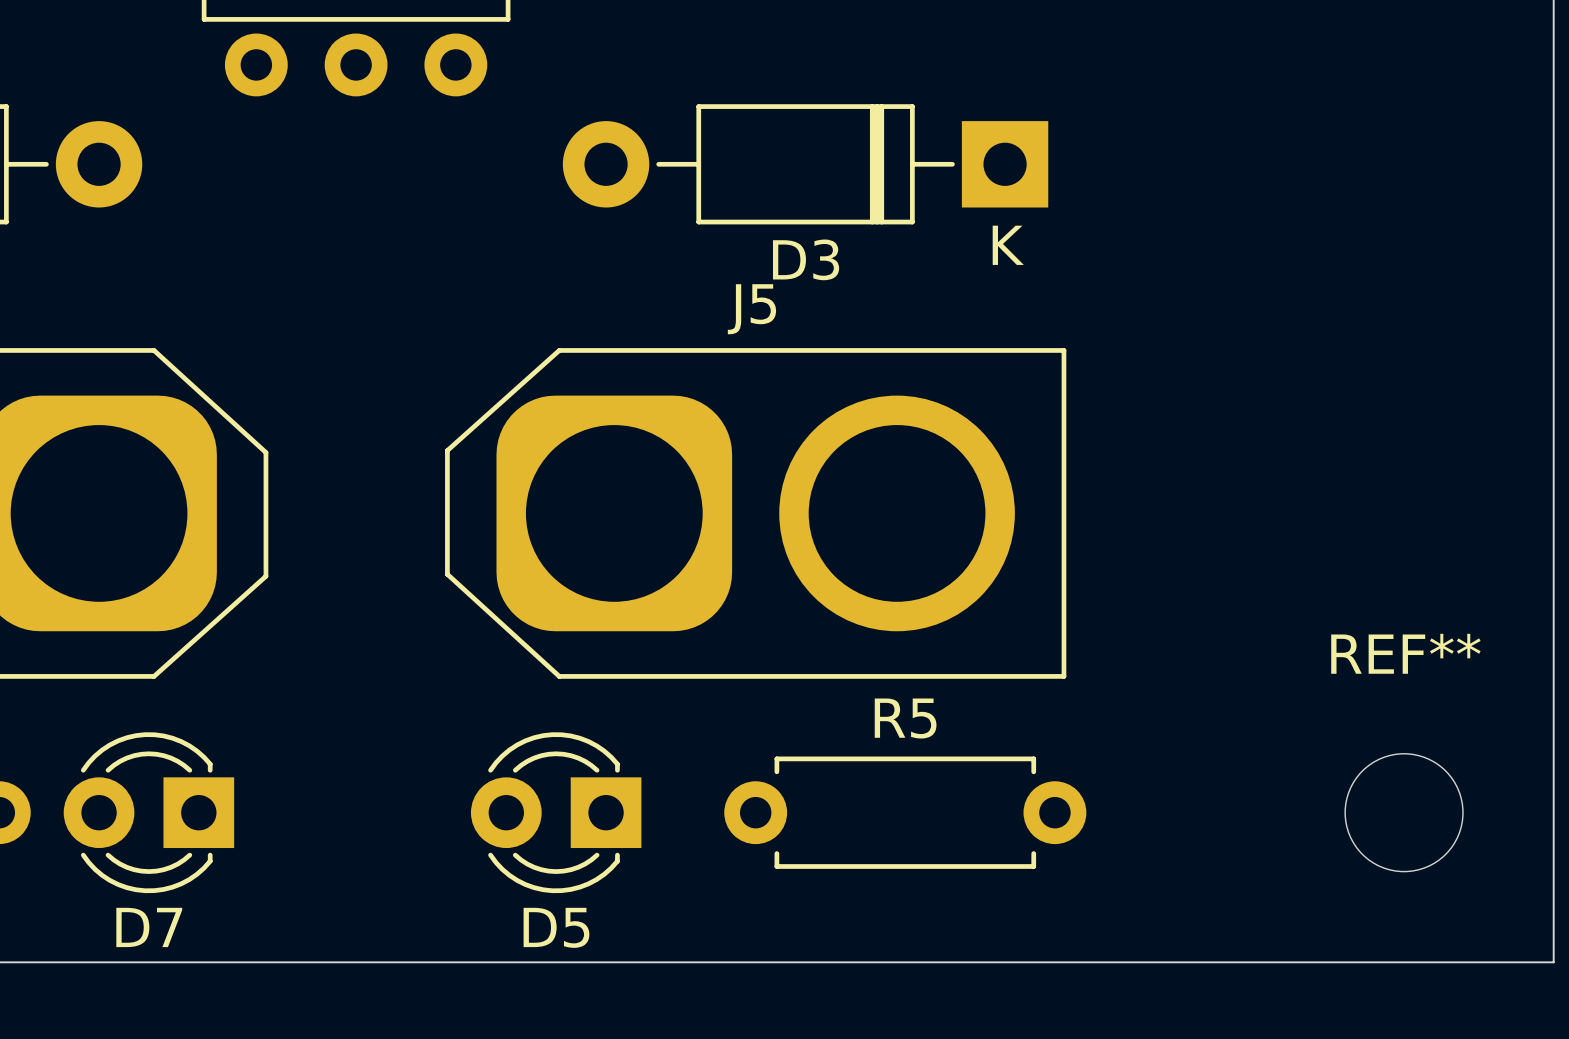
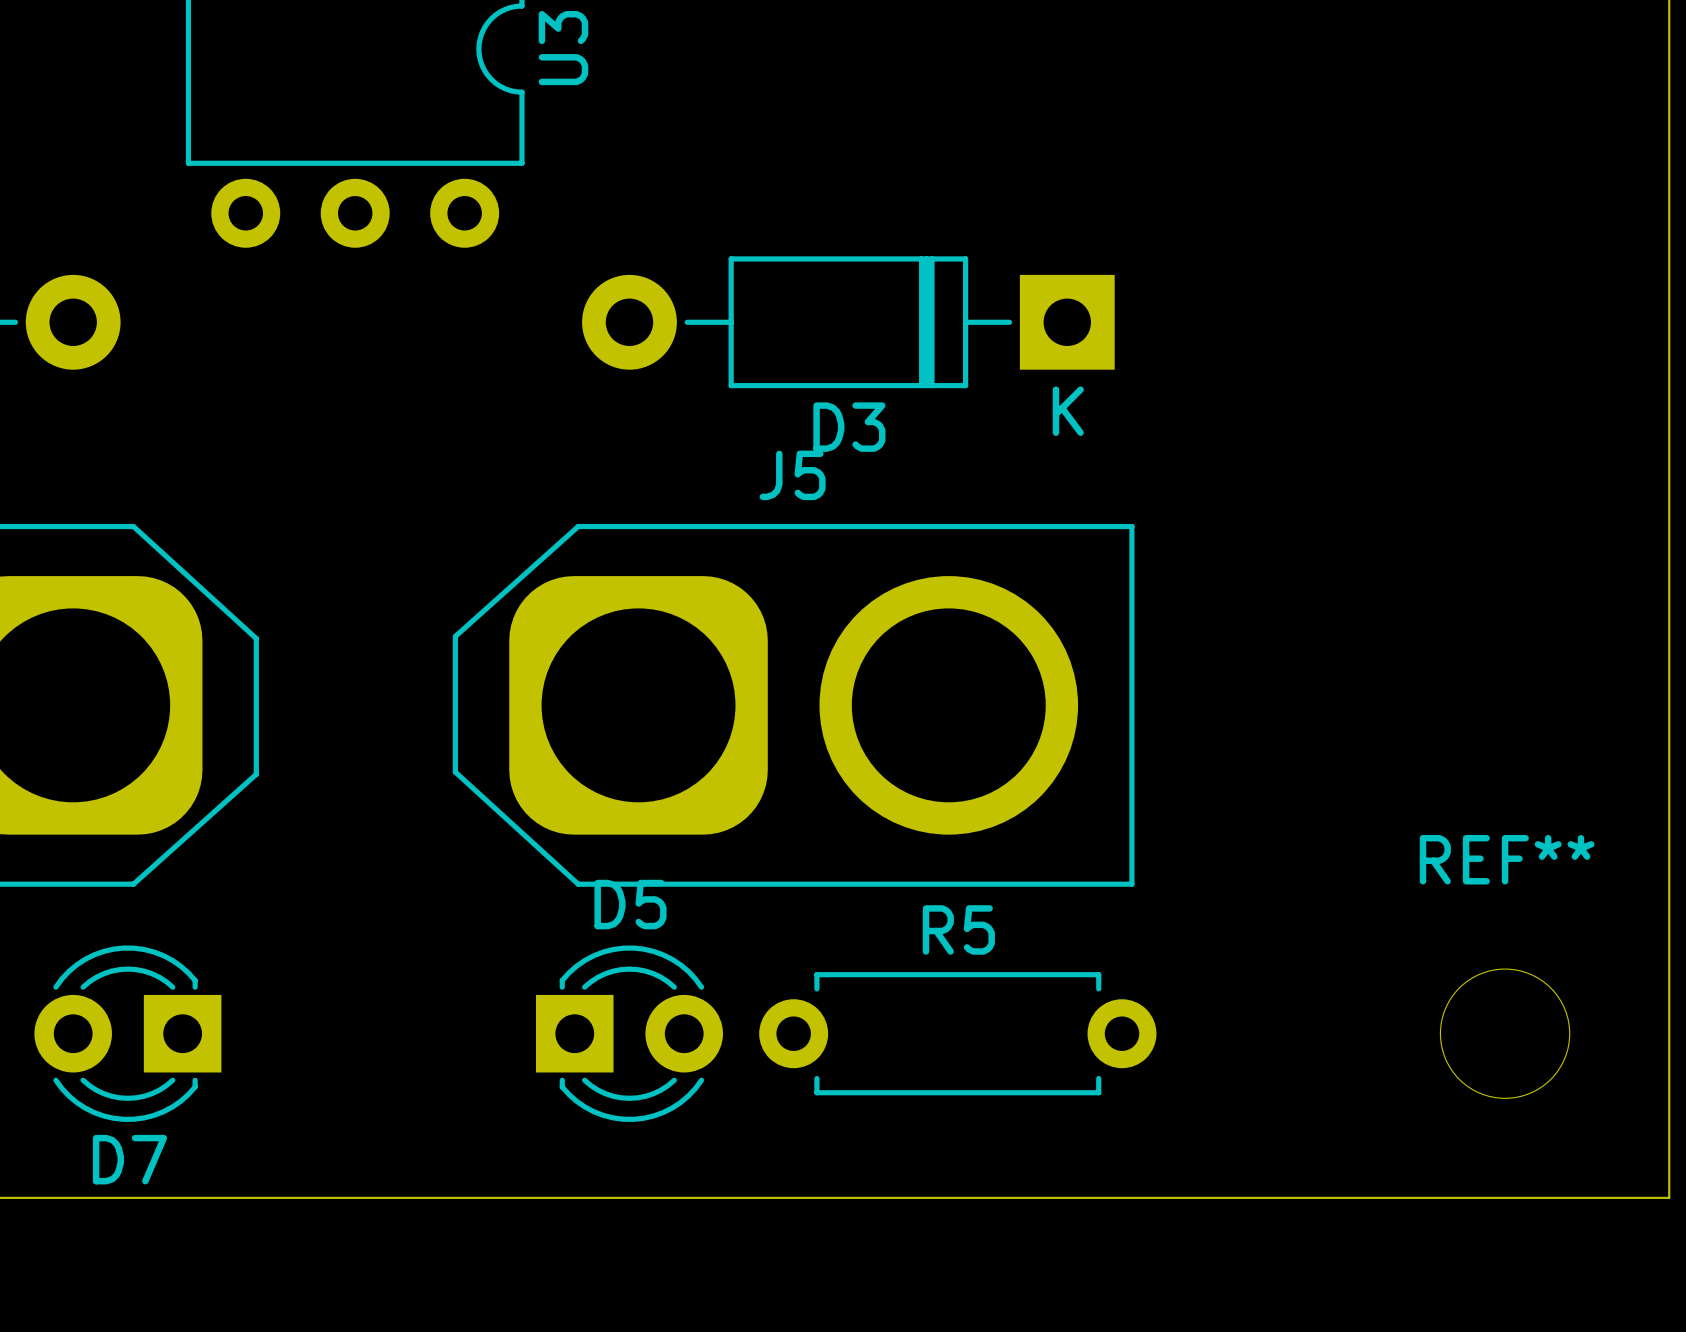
D5 rotation: 0° (556, 812) -> 180° (629, 1033)

